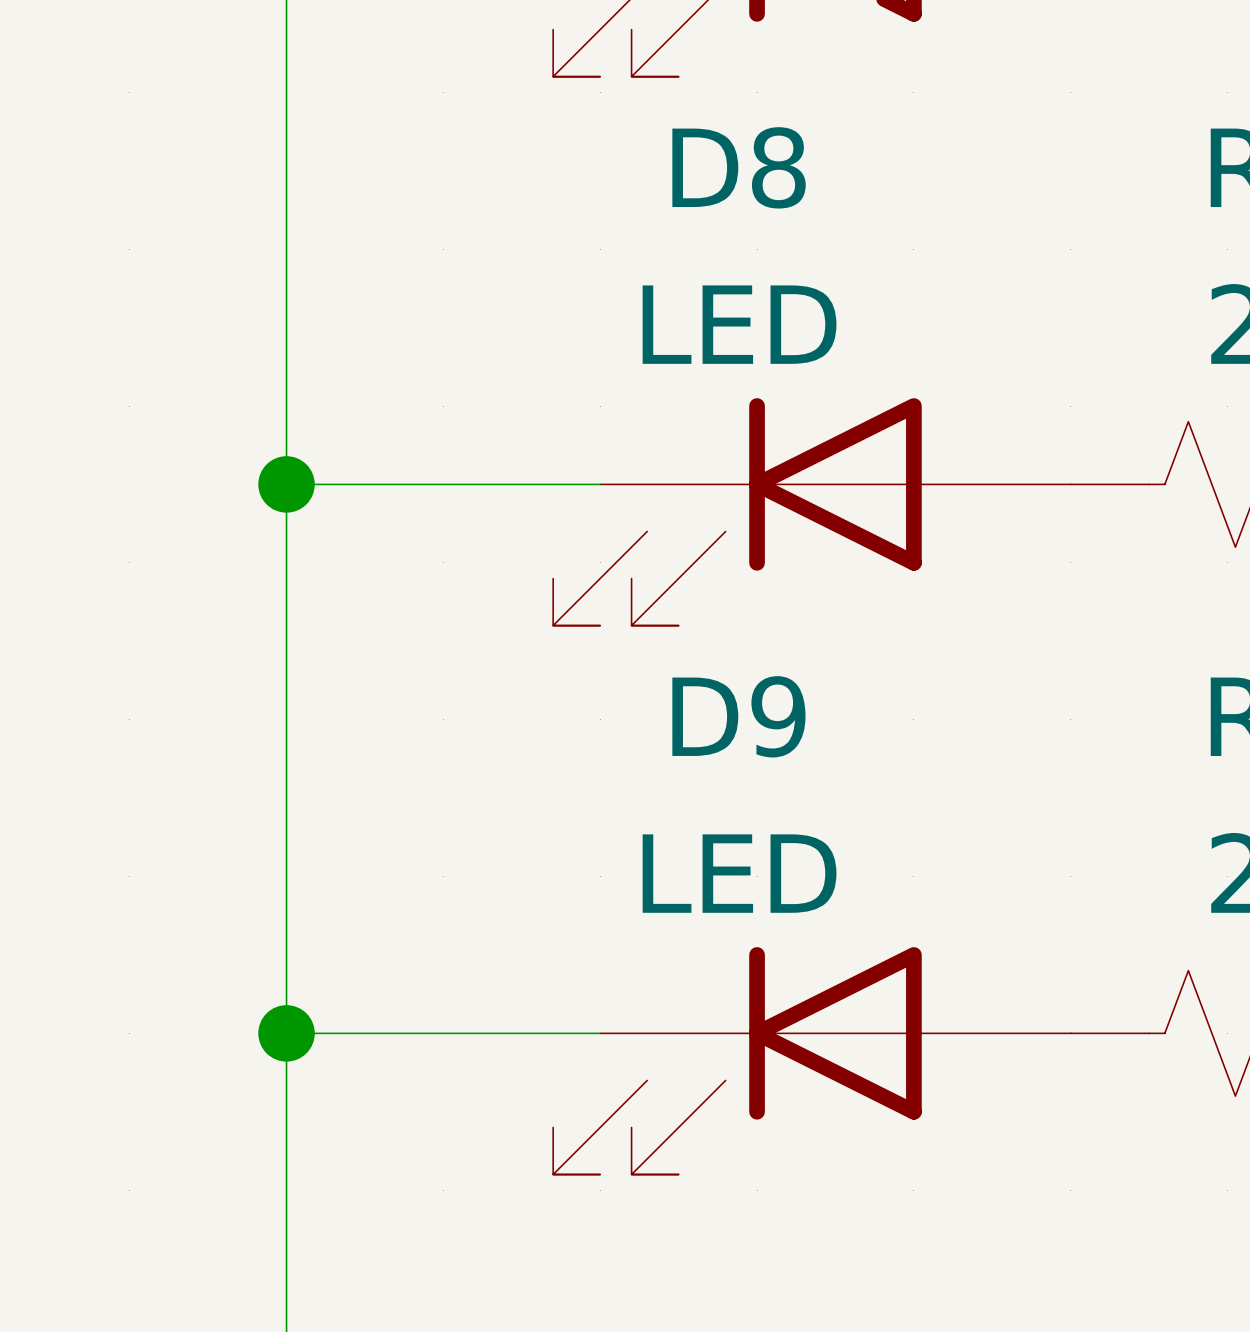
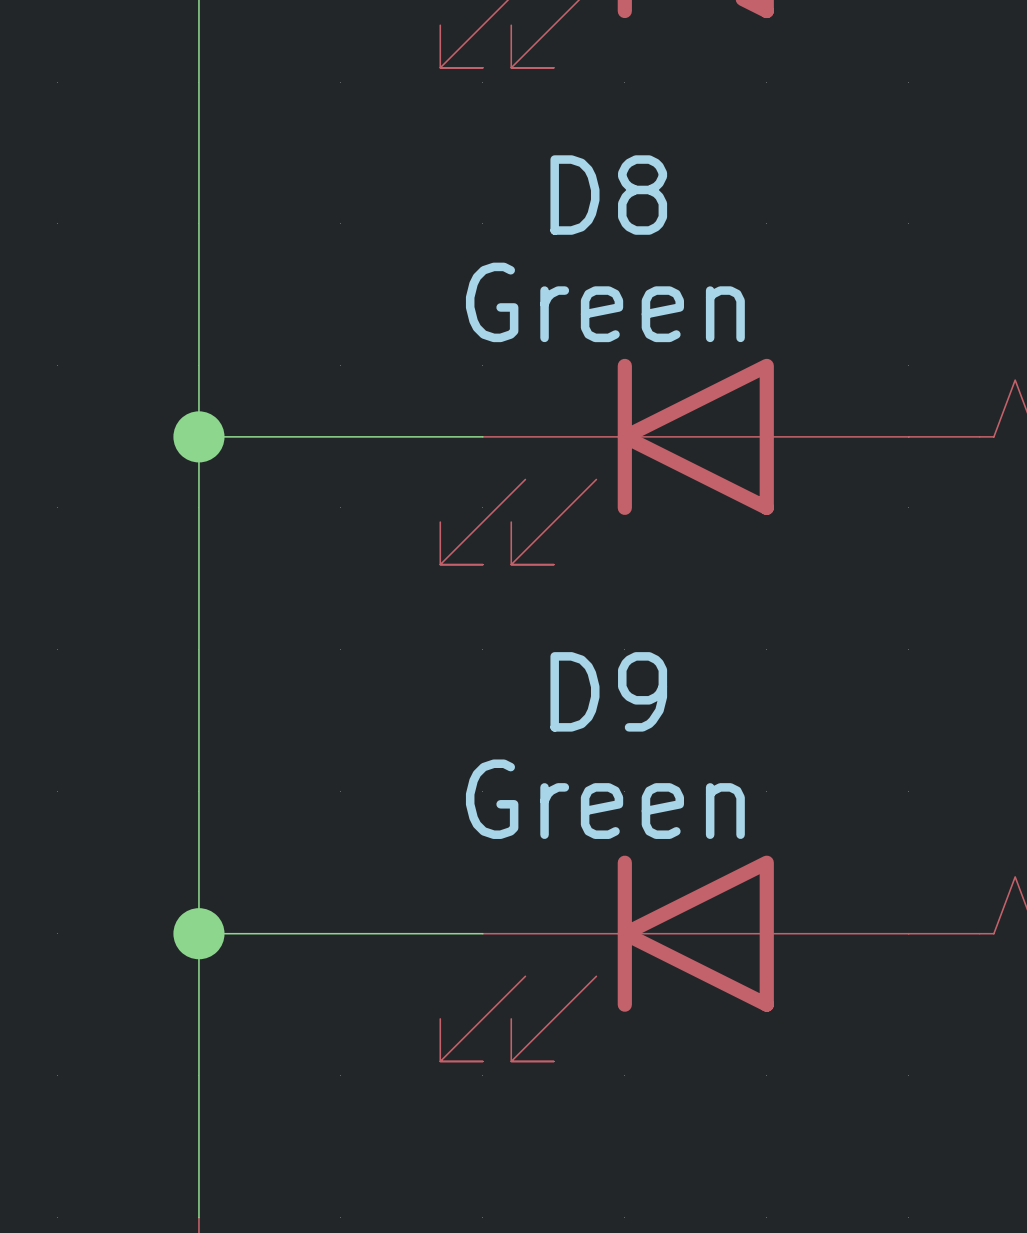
D8 name position: D8 (739, 167) -> D8 (608, 195)
D8 value: LED (739, 324) -> Green (605, 302)
D9 name position: D9 (738, 716) -> D9 (608, 691)
D9 value: LED (739, 873) -> Green (605, 799)

